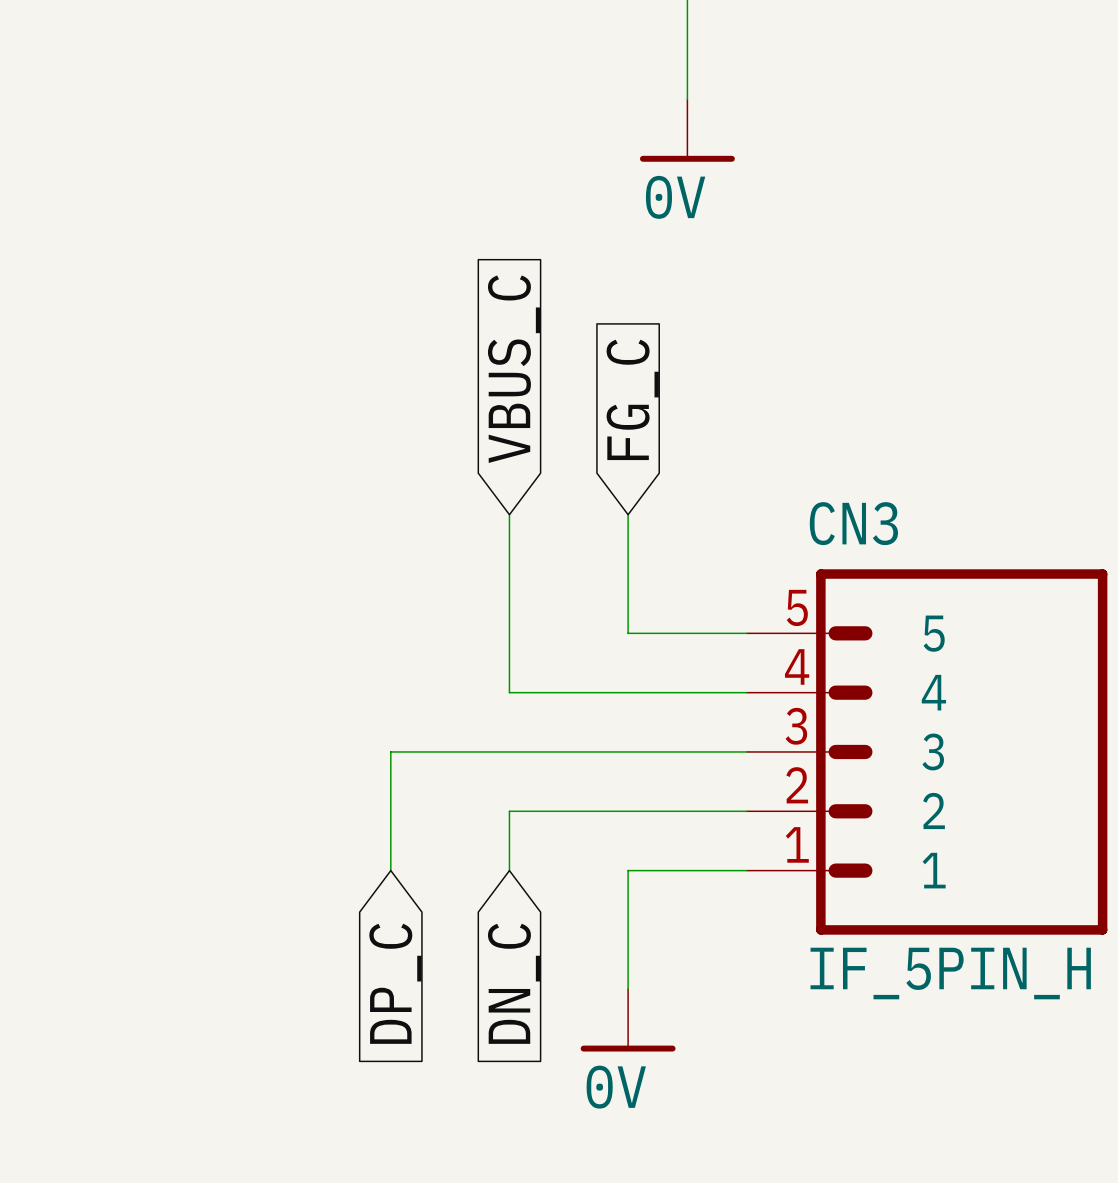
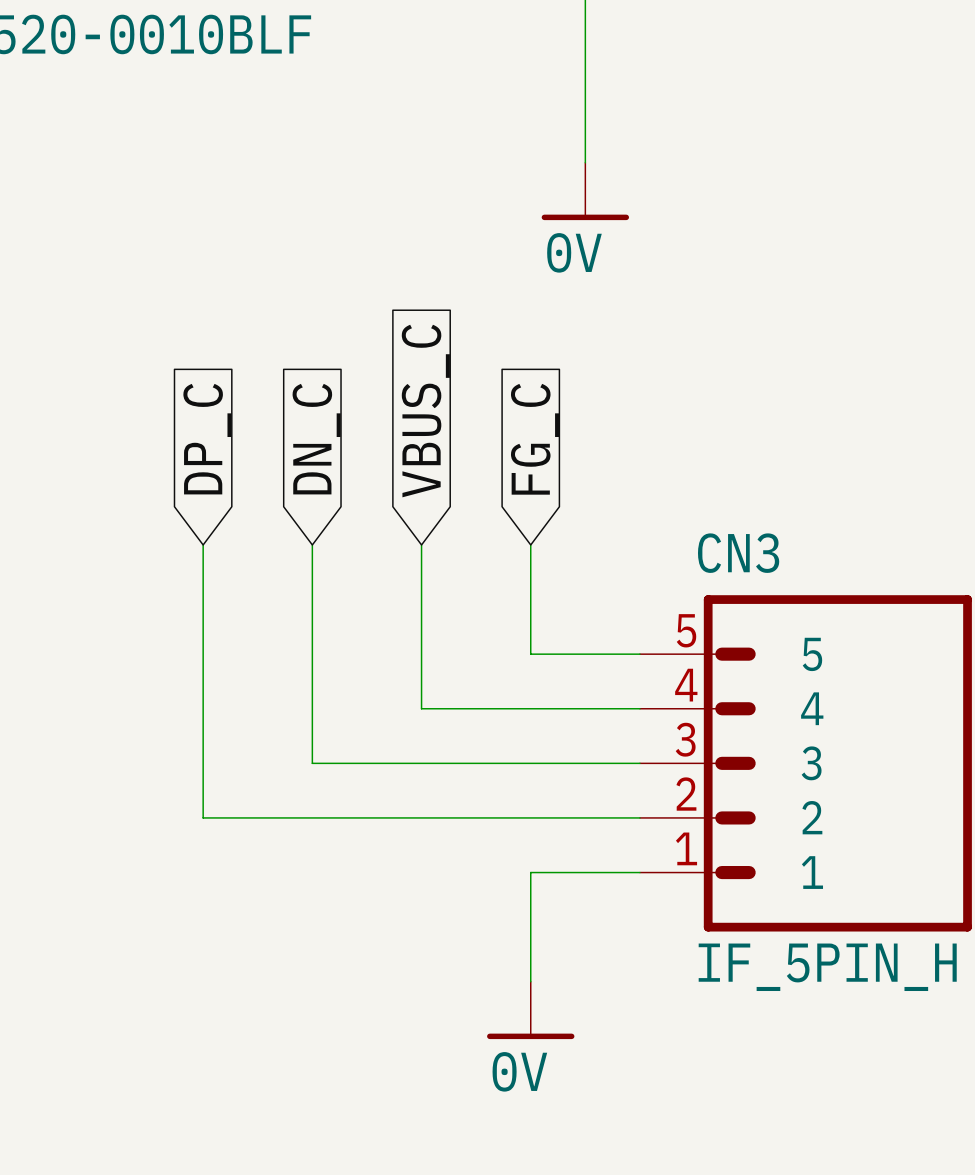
wire: (390, 751) (390, 870) -> (312, 763) (312, 544)
wire: (509, 811) (509, 870) -> (421, 817) (203, 817) (203, 544)
global label rotation: 0° (395, 983) -> 180° (207, 439)
global label position: DP_C (395, 983) -> DP_C (207, 439)
global label rotation: 0° (514, 983) -> 180° (316, 439)
global label position: DN_C (514, 983) -> DN_C (316, 439)

